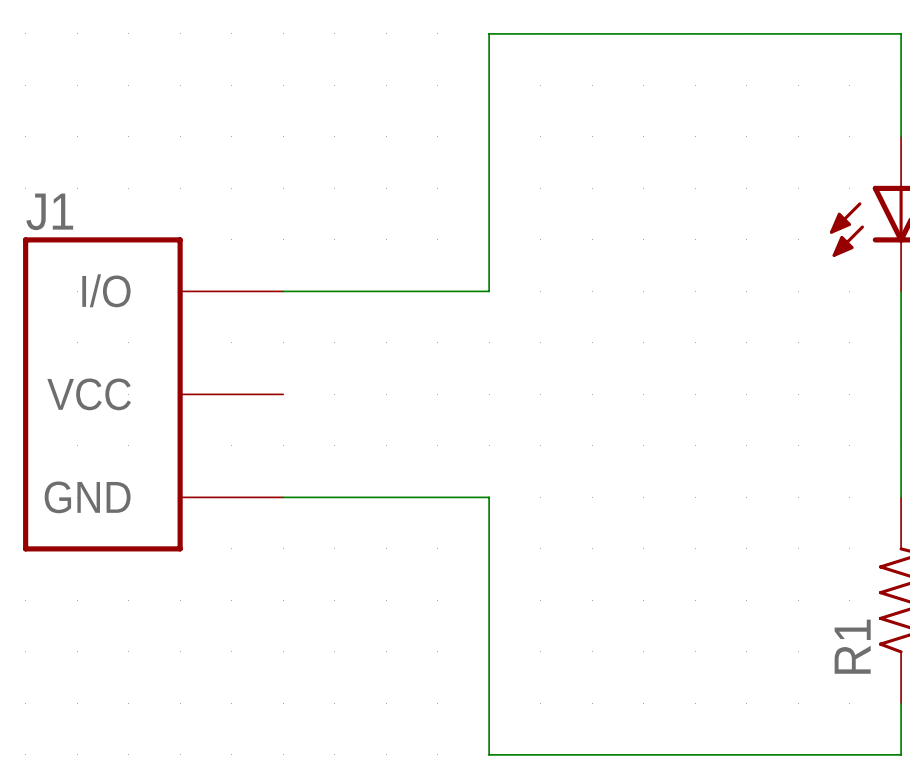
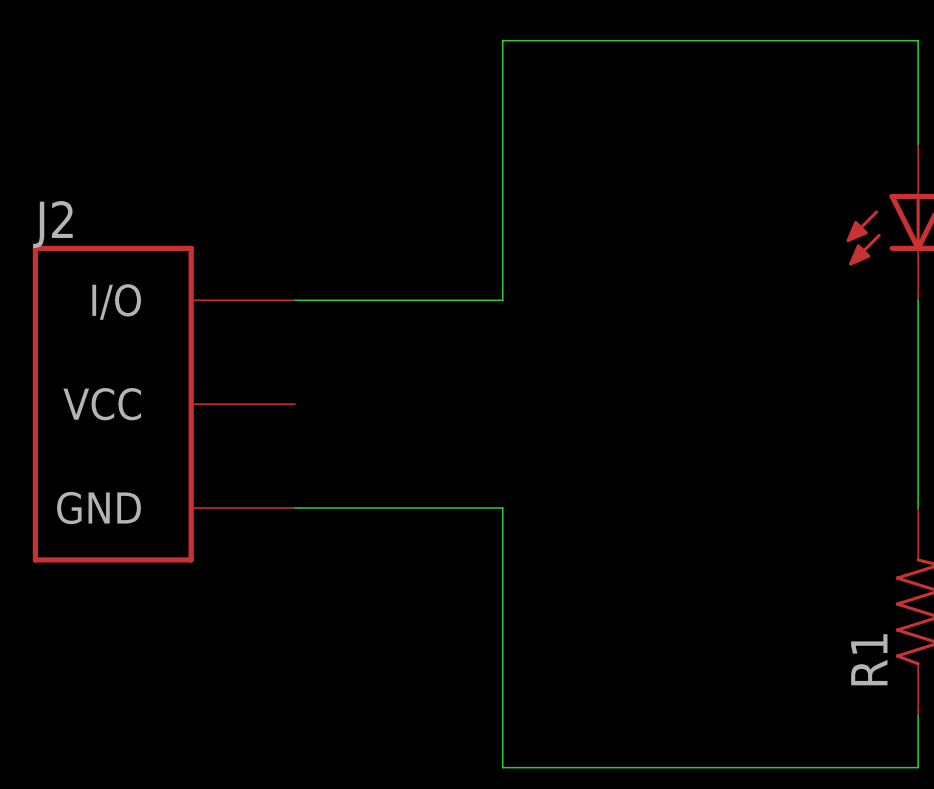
J1 name: J1 (49, 211) -> J2 (52, 224)

